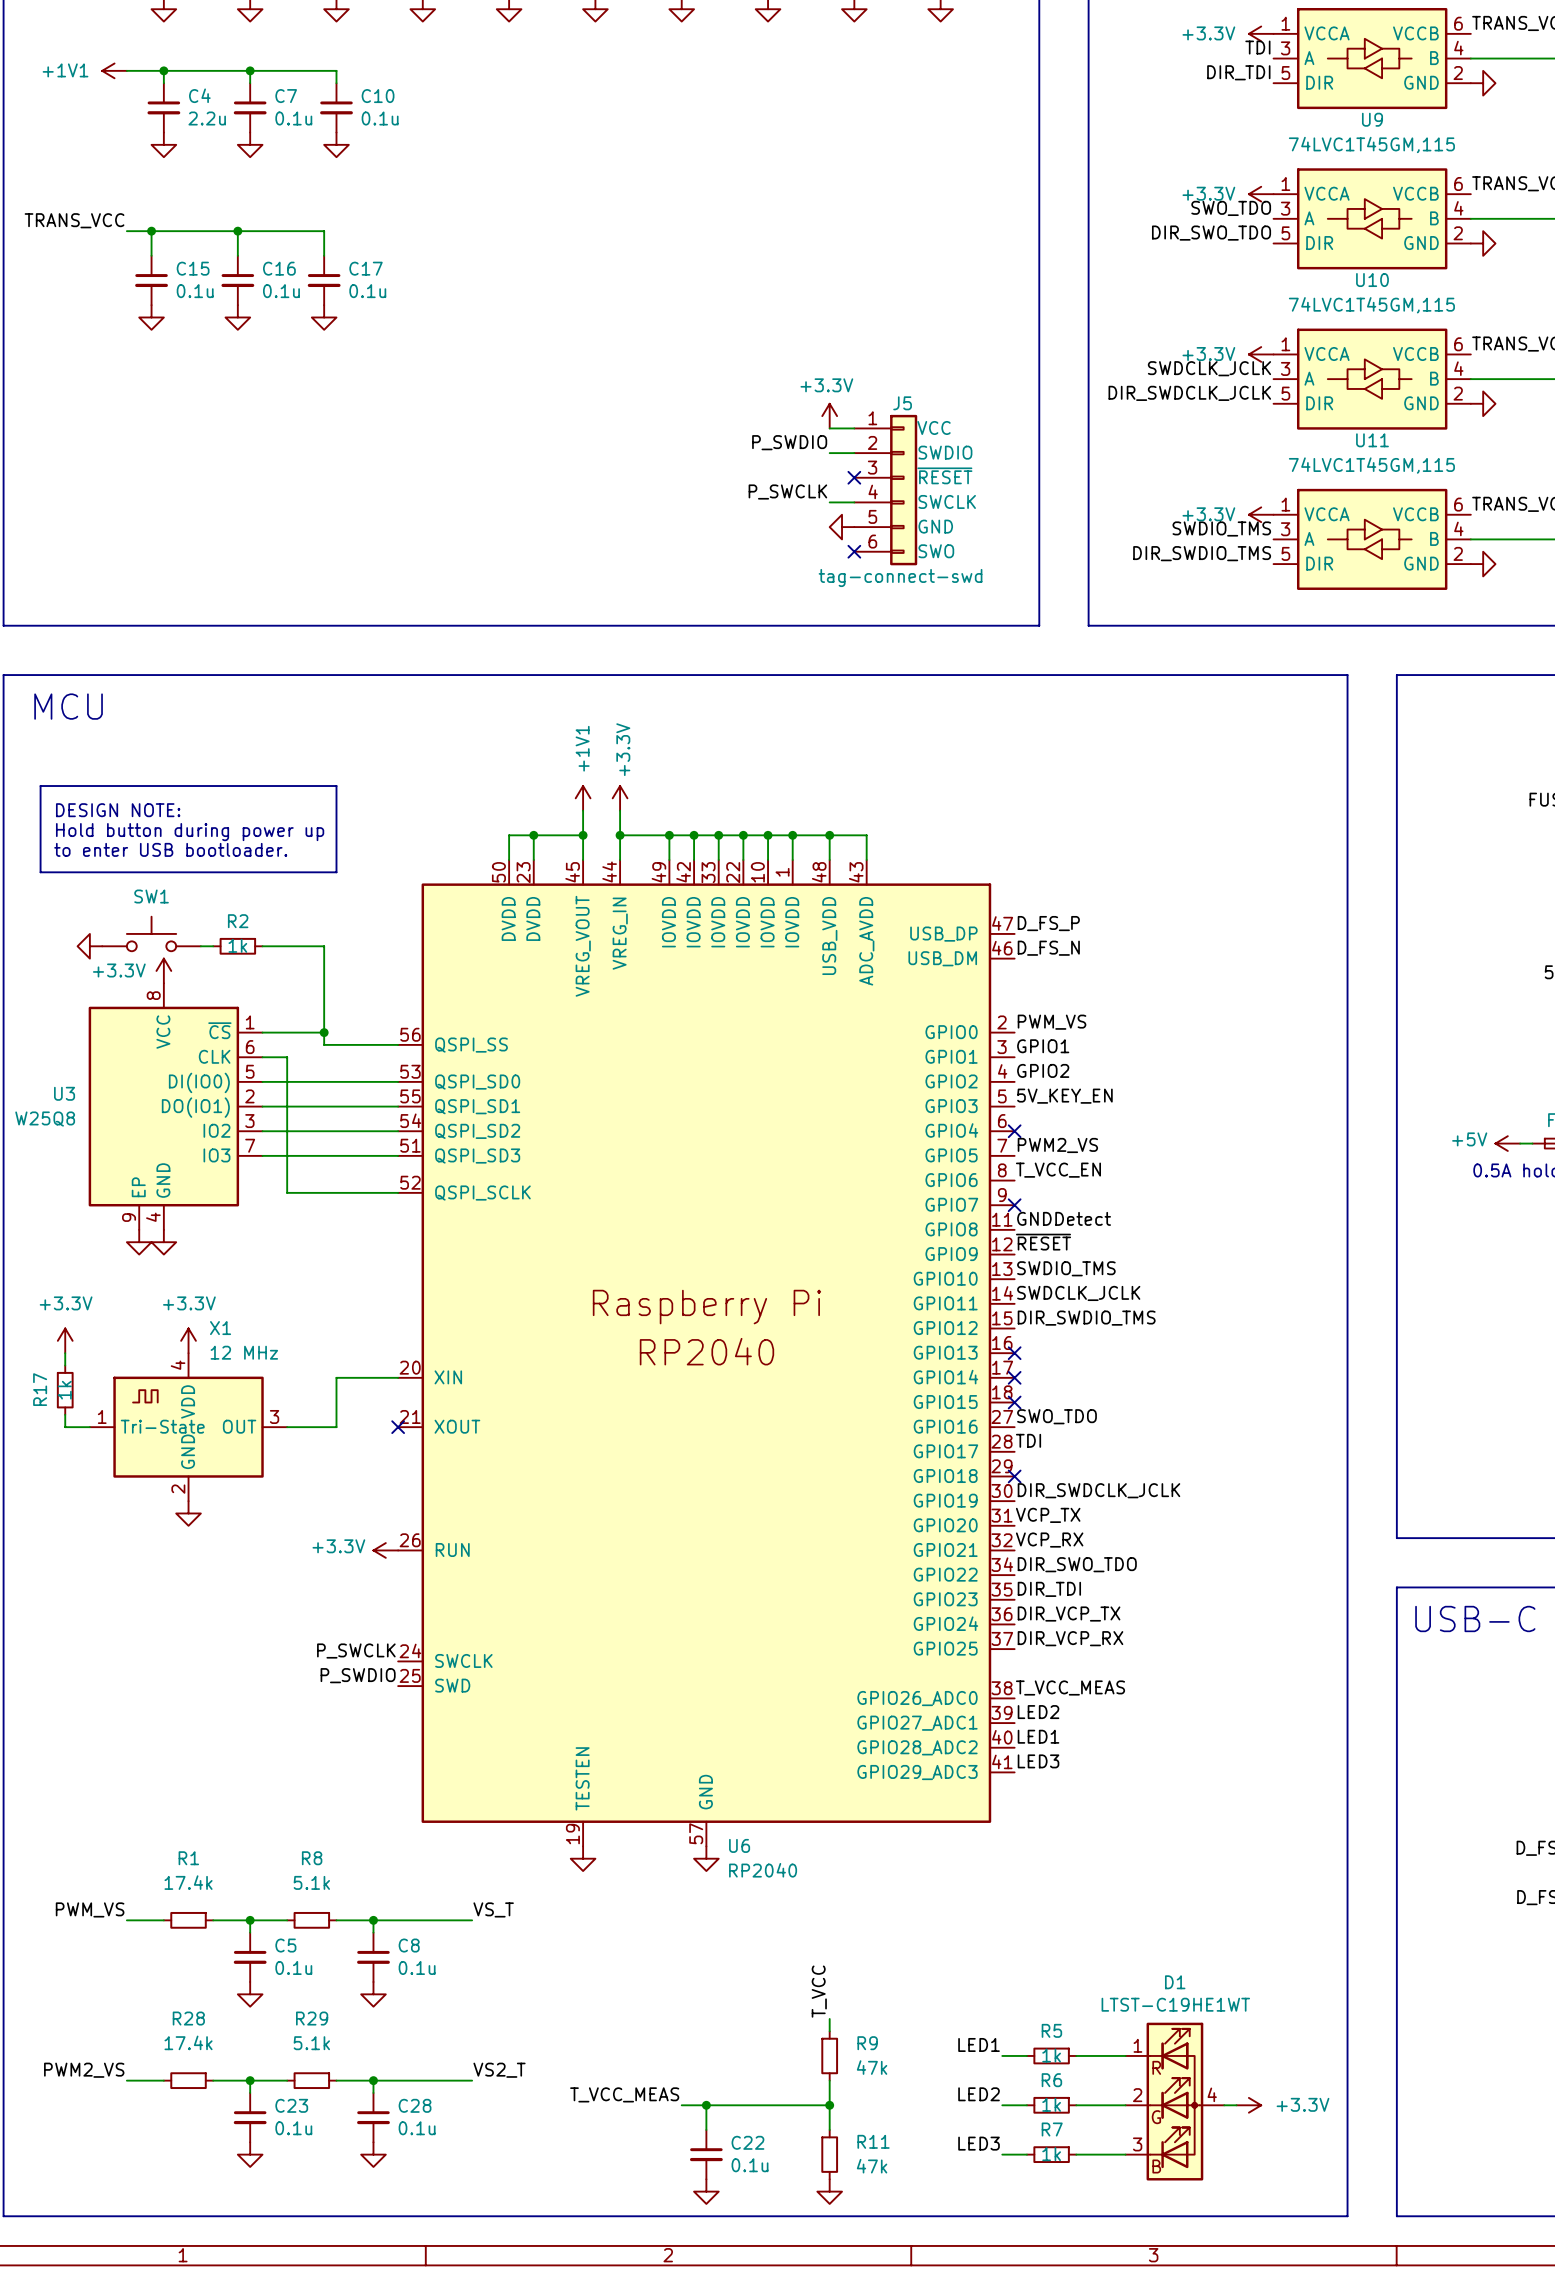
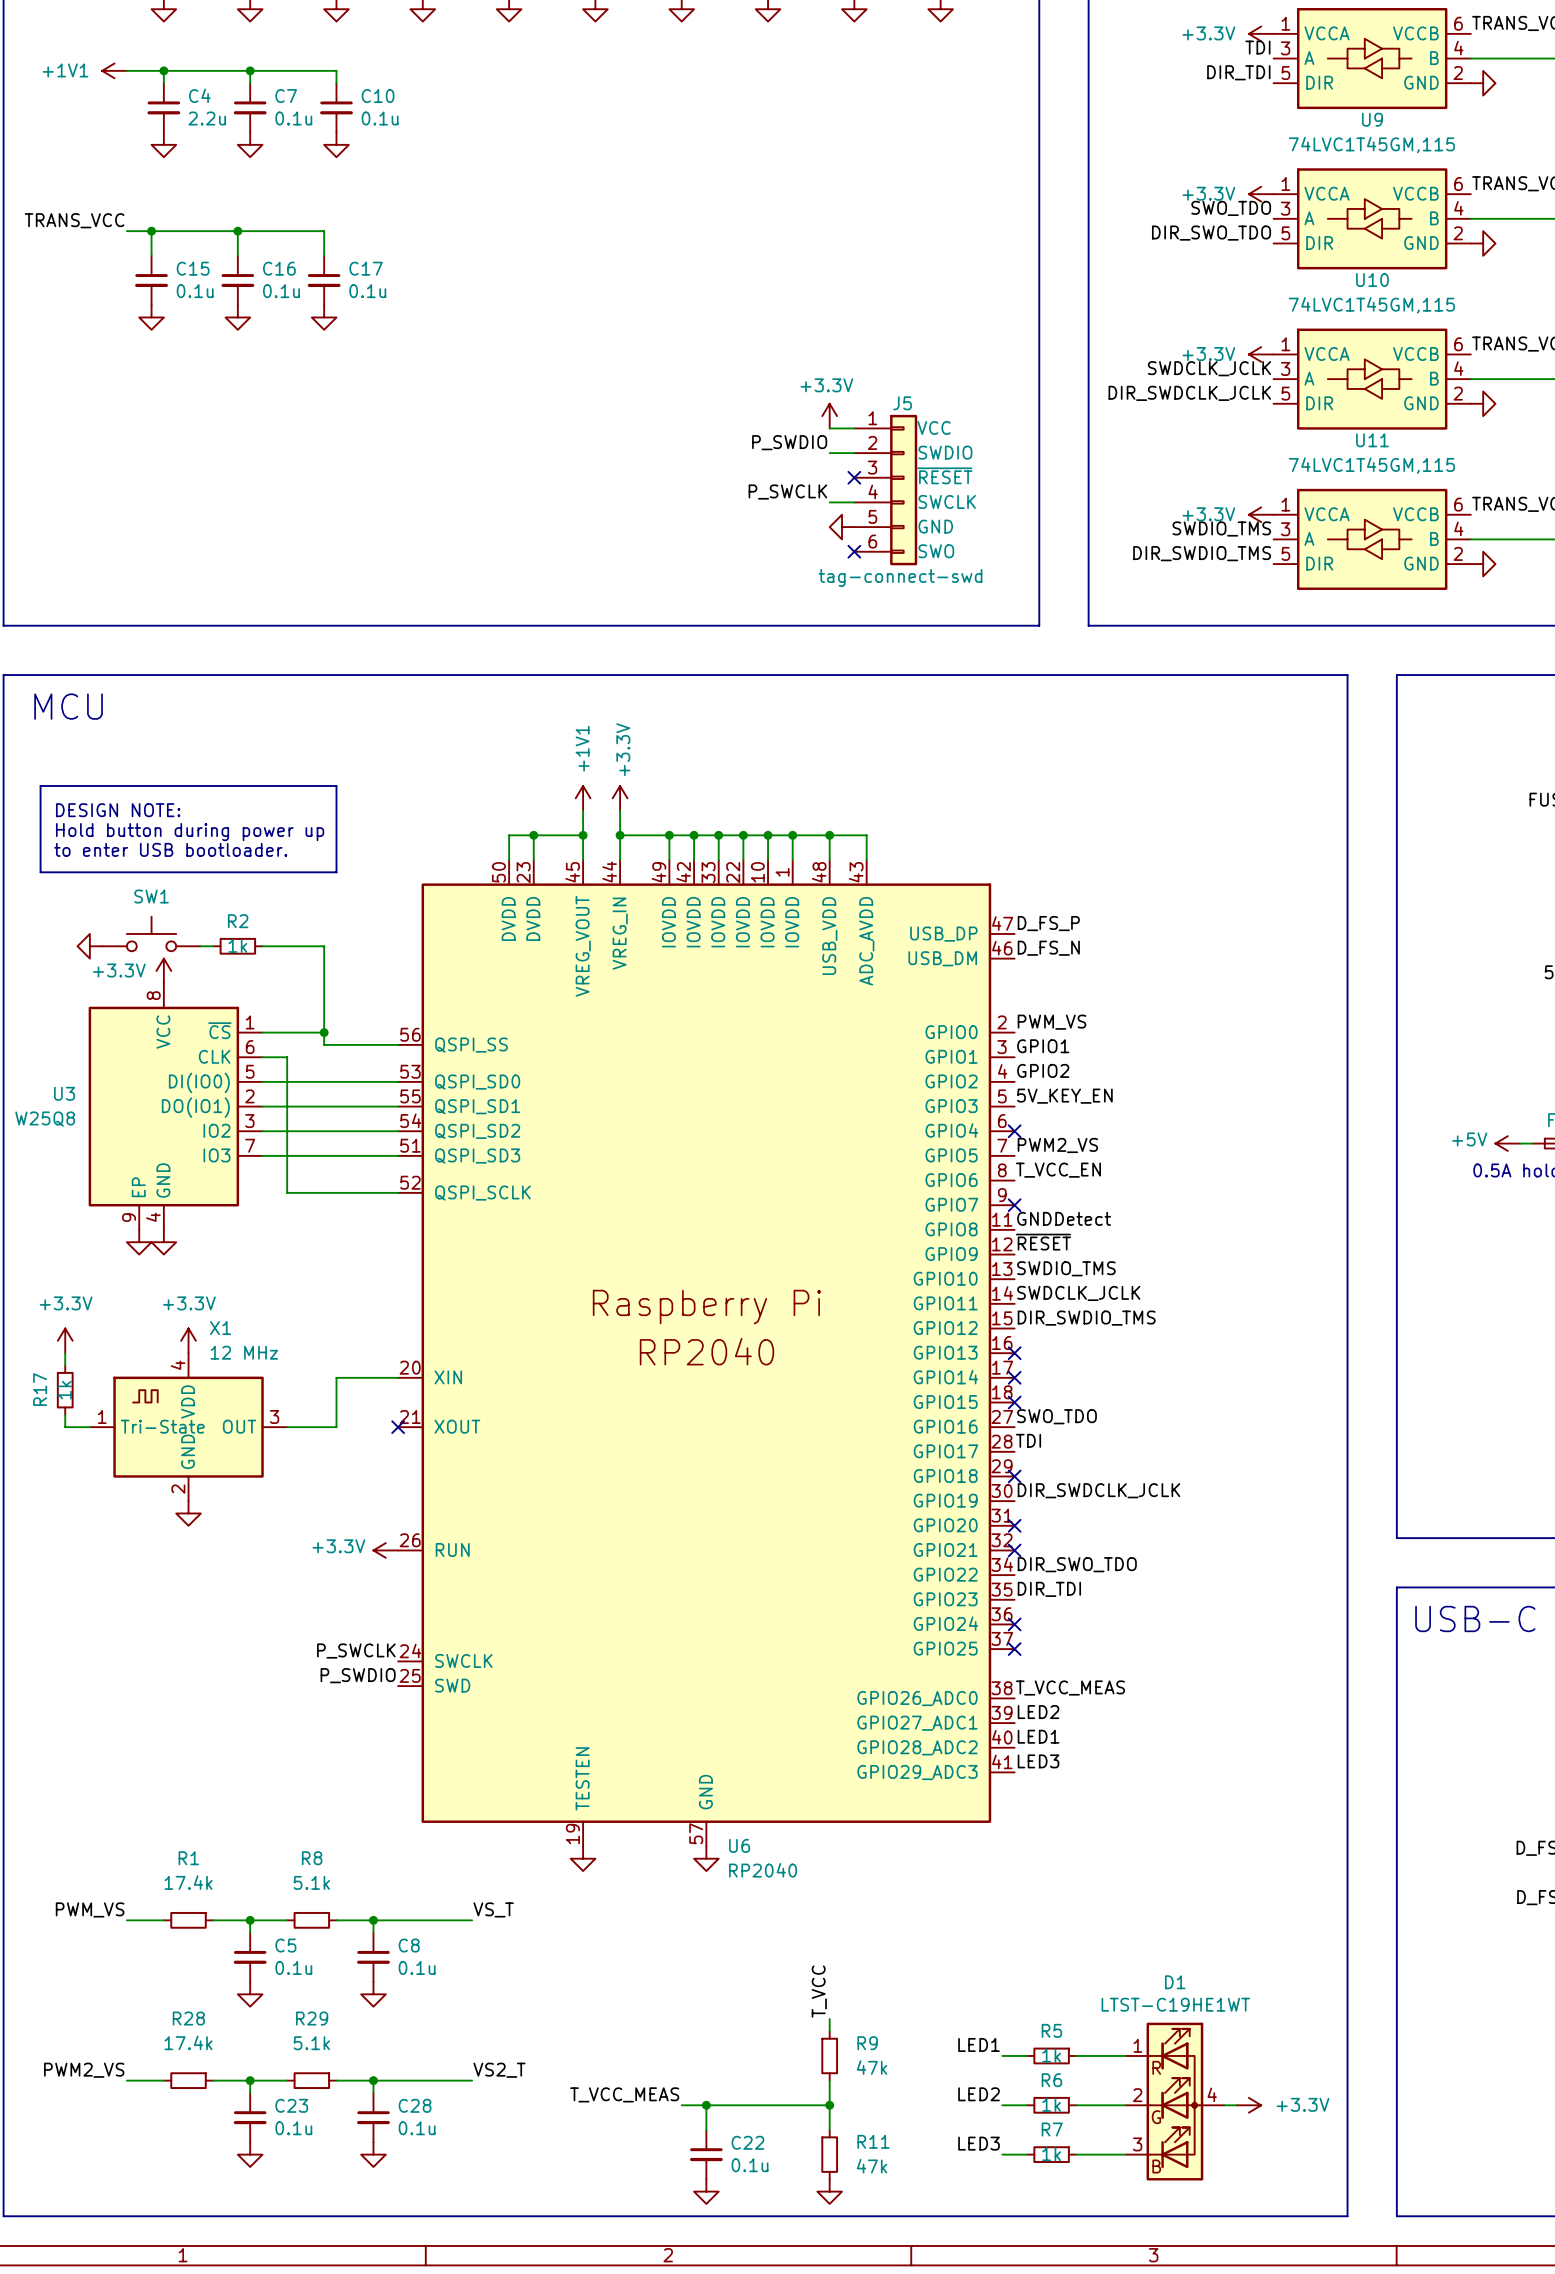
label: VCP_TX (1048, 1515) -> none
no-connect mark: none -> (1014, 1525)
label: VCP_RX (1049, 1540) -> none
no-connect mark: none -> (1014, 1550)
label: DIR_VCP_TX (1069, 1614) -> none
no-connect mark: none -> (1014, 1624)
label: DIR_VCP_RX (1070, 1638) -> none
no-connect mark: none -> (1014, 1649)

